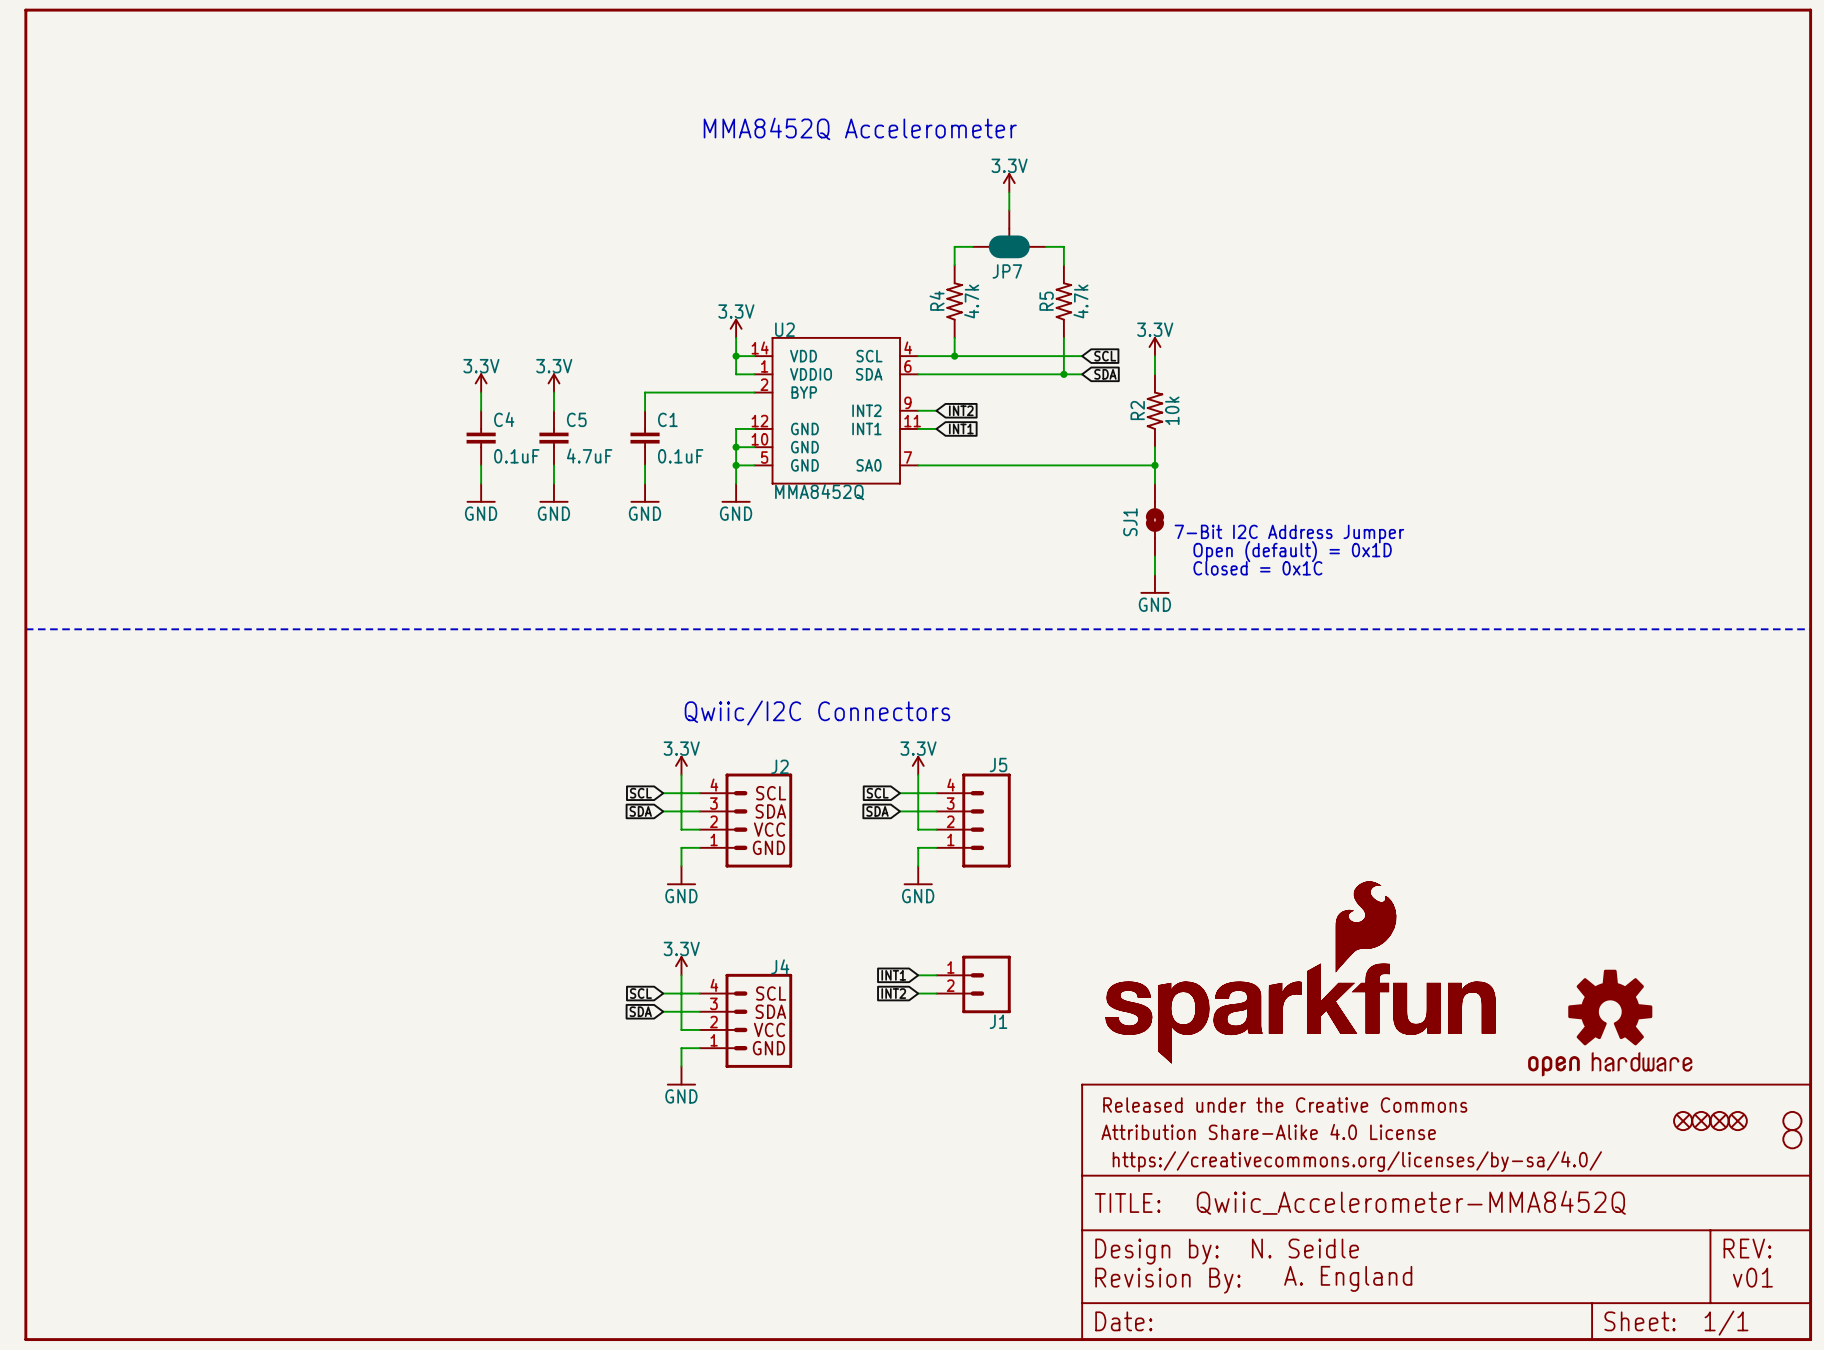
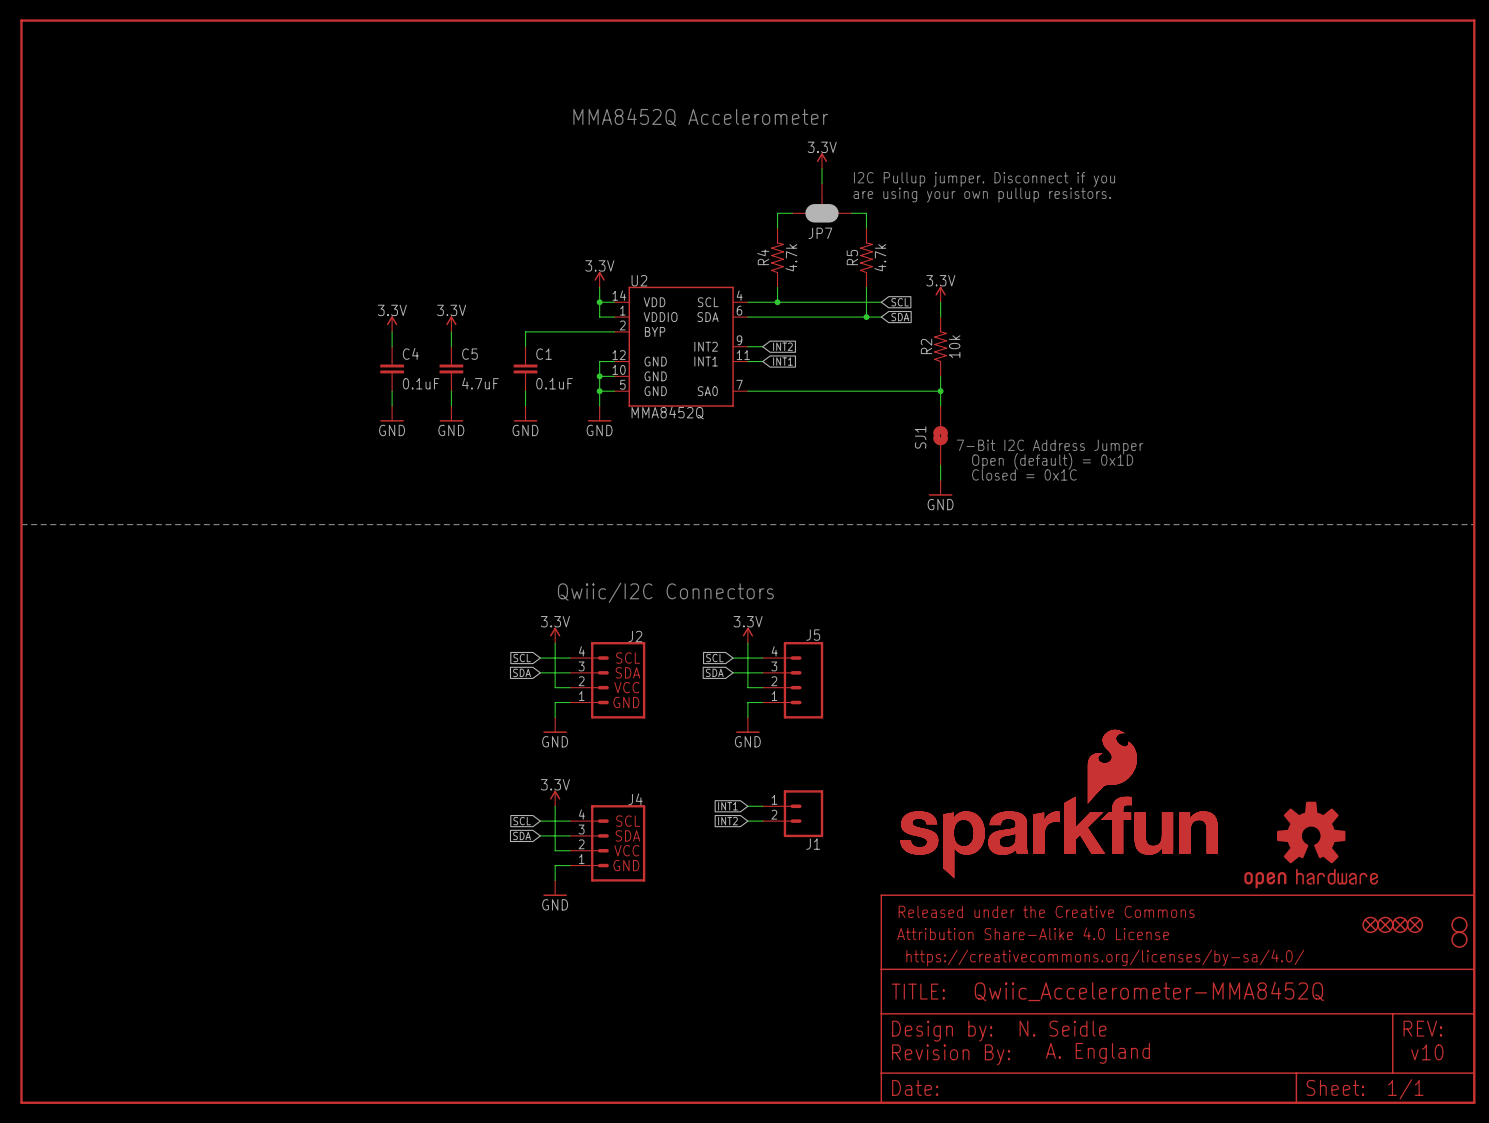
text: none -> I2C Pullup jumper. Disconnect if you (984, 179)
text: none -> are using your own pullup resistors. (982, 195)
text: v01 (1752, 1277) -> v10 (1427, 1052)

